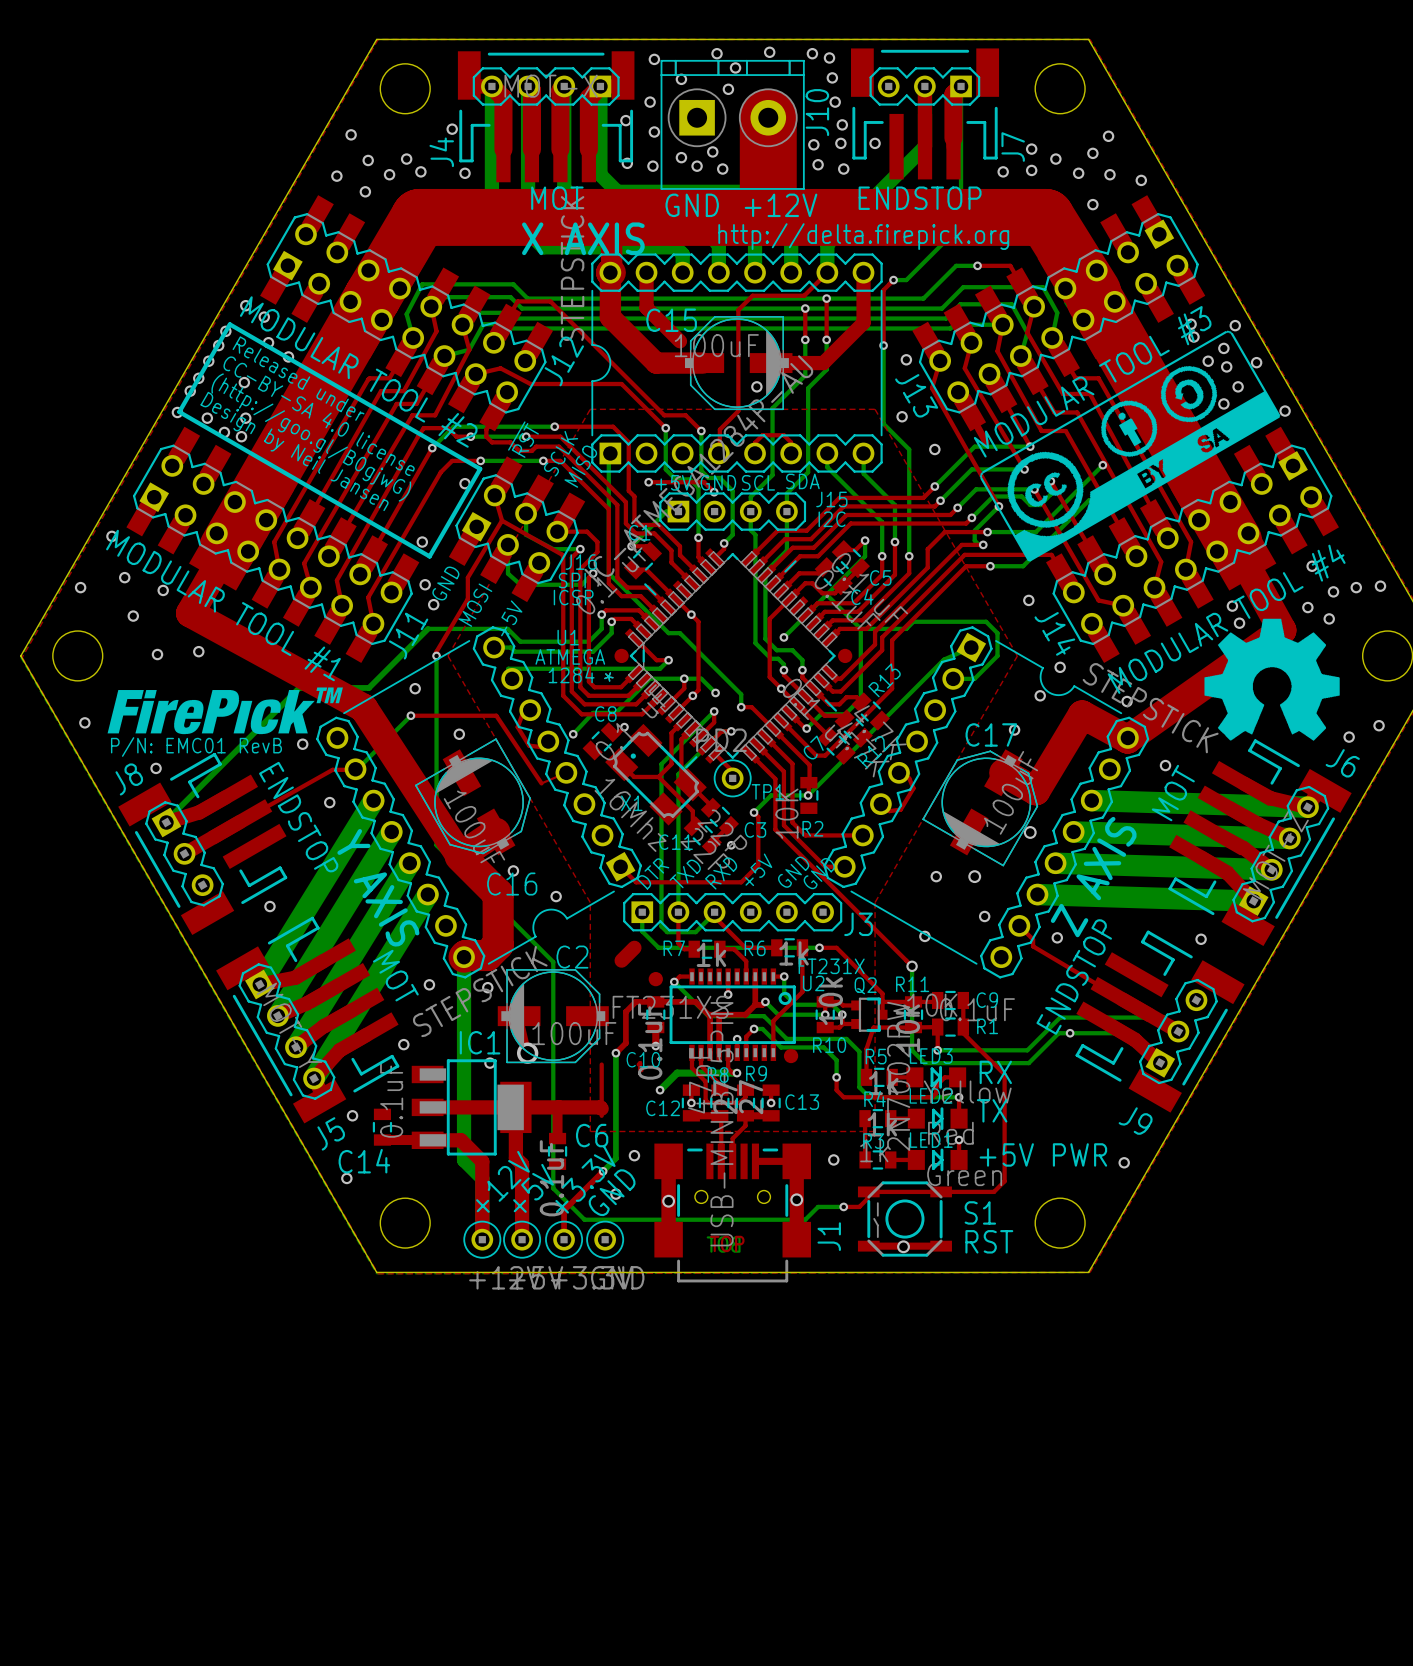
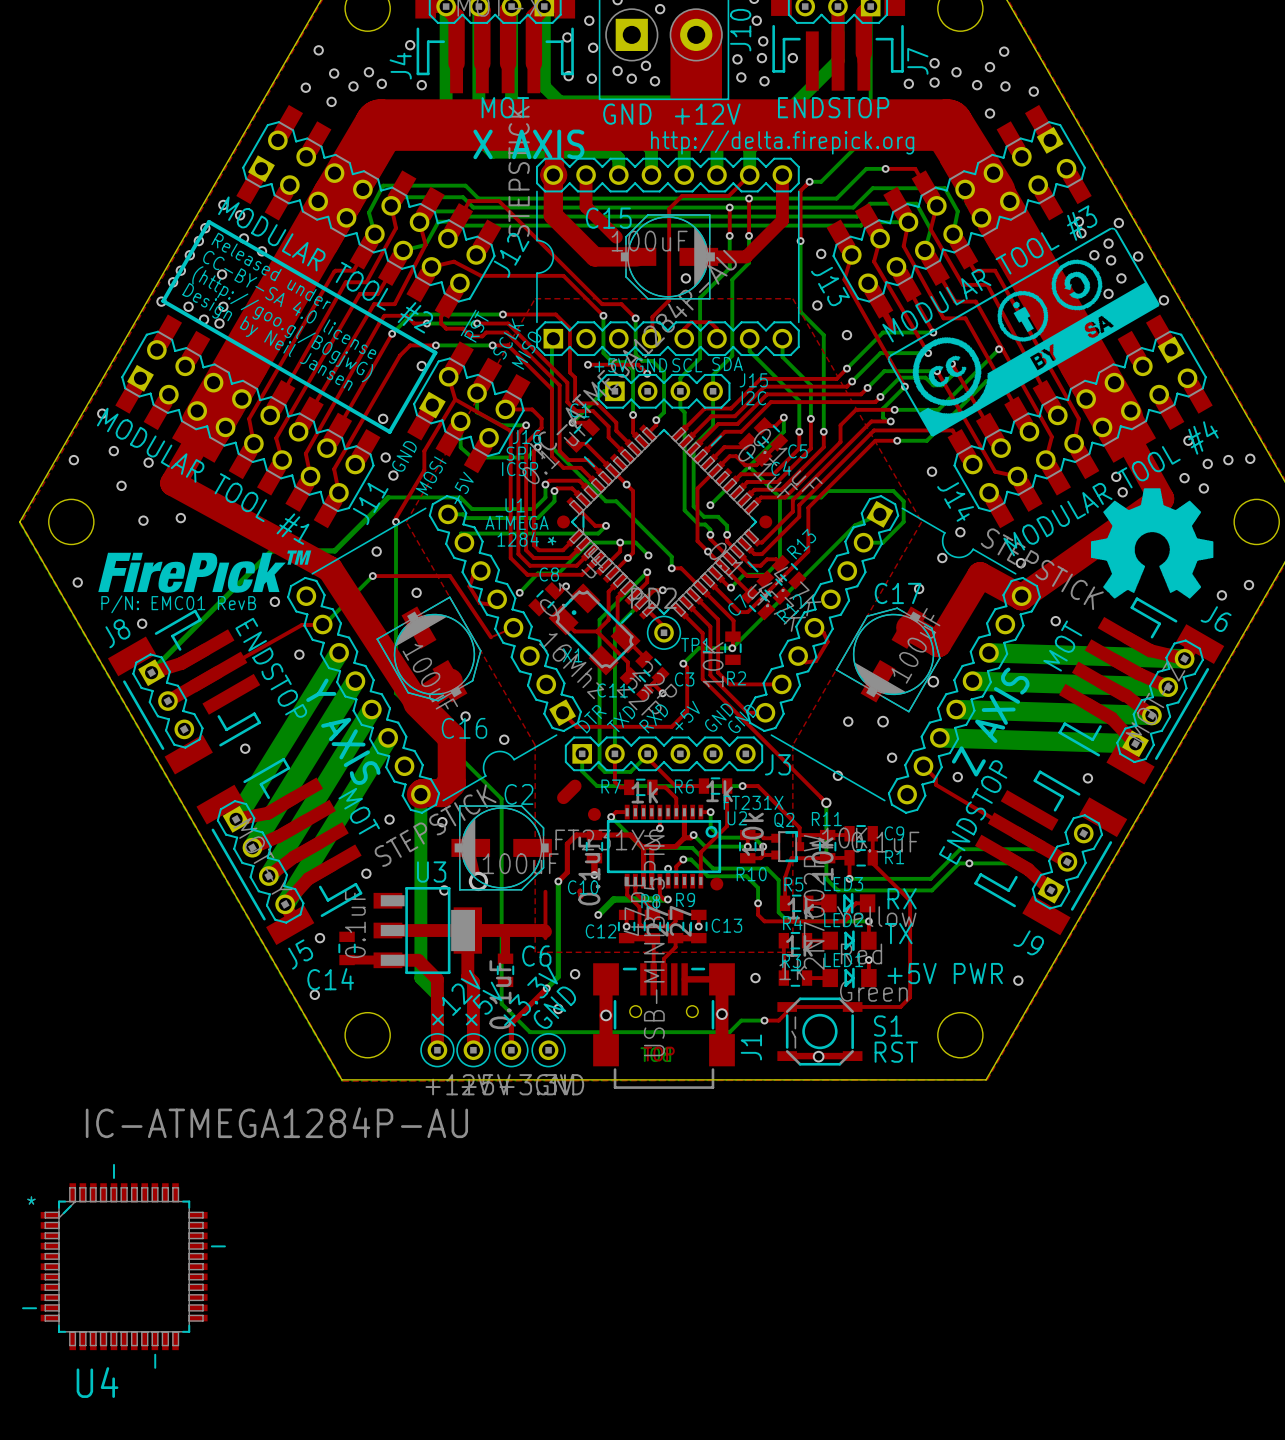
top track: none -> (651, 684) (654, 684) (662, 693)
IC1 name: IC1 (480, 1042) -> U3 (431, 871)
U4: none -> IC-ATMEGA1284P-AU (123, 1266)

